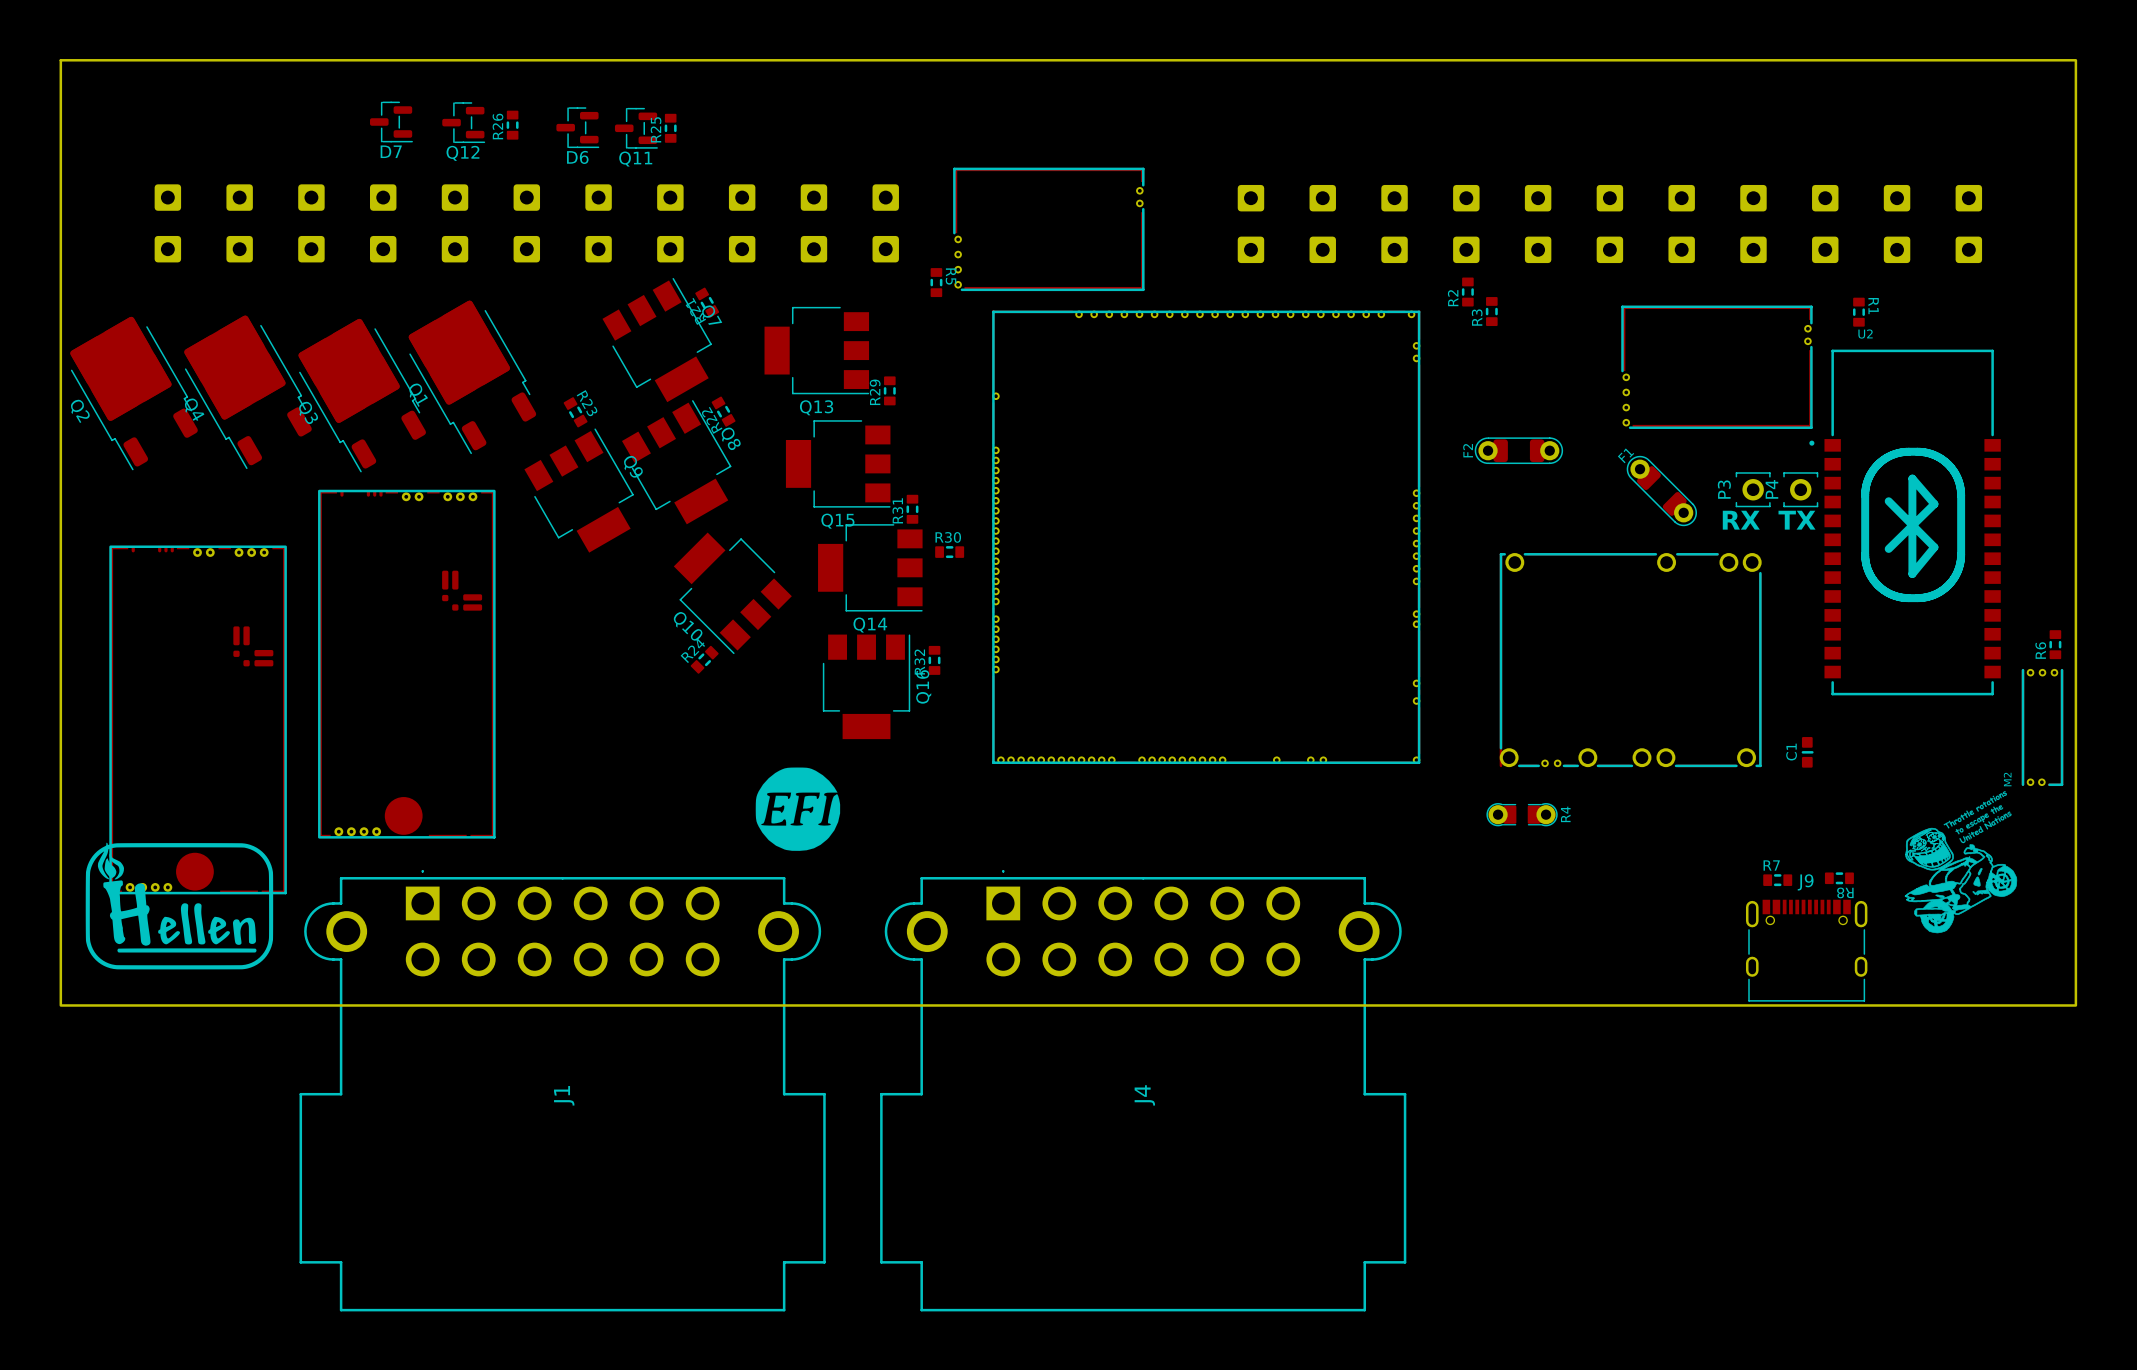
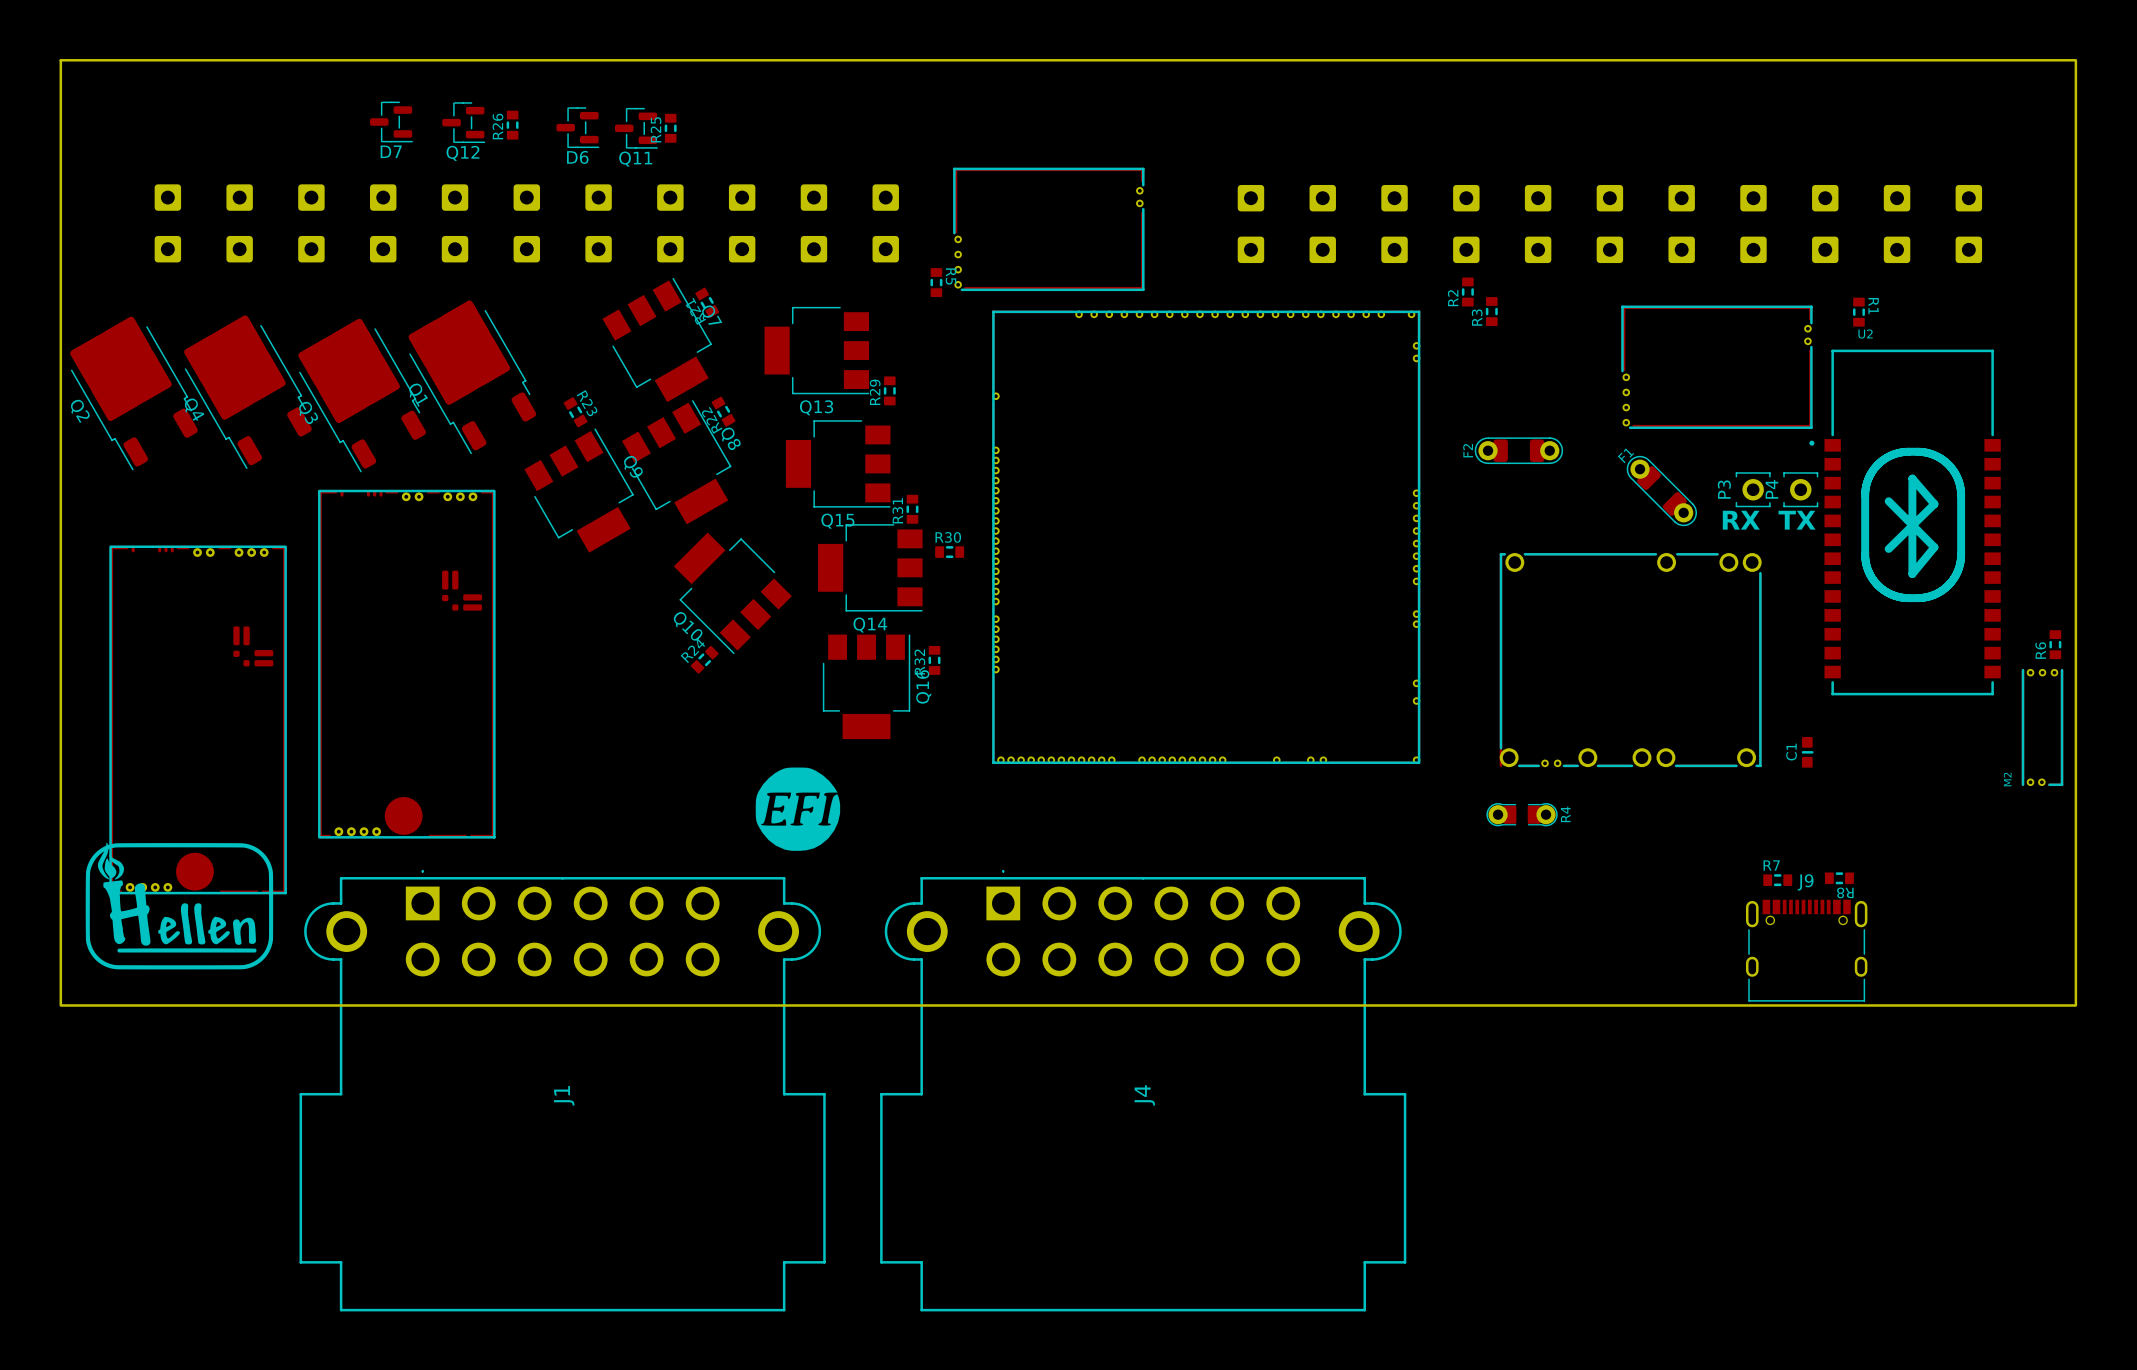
drawing: [1904, 791, 2018, 934] -> none

